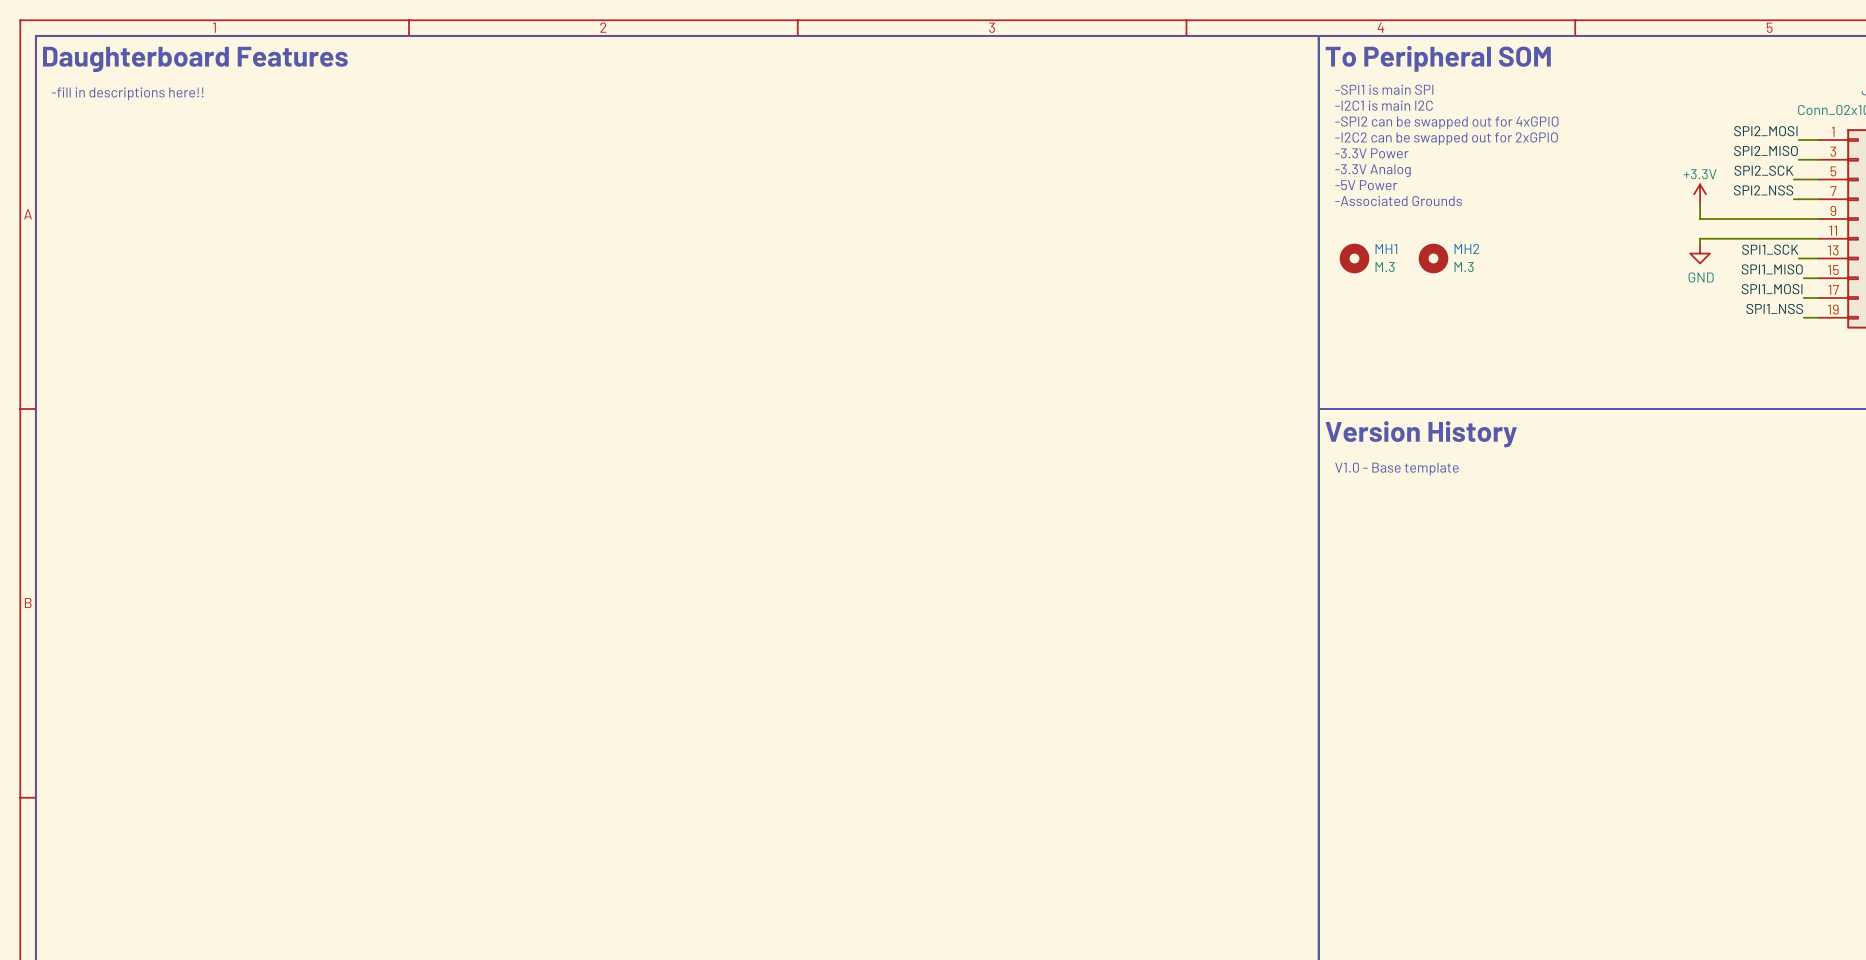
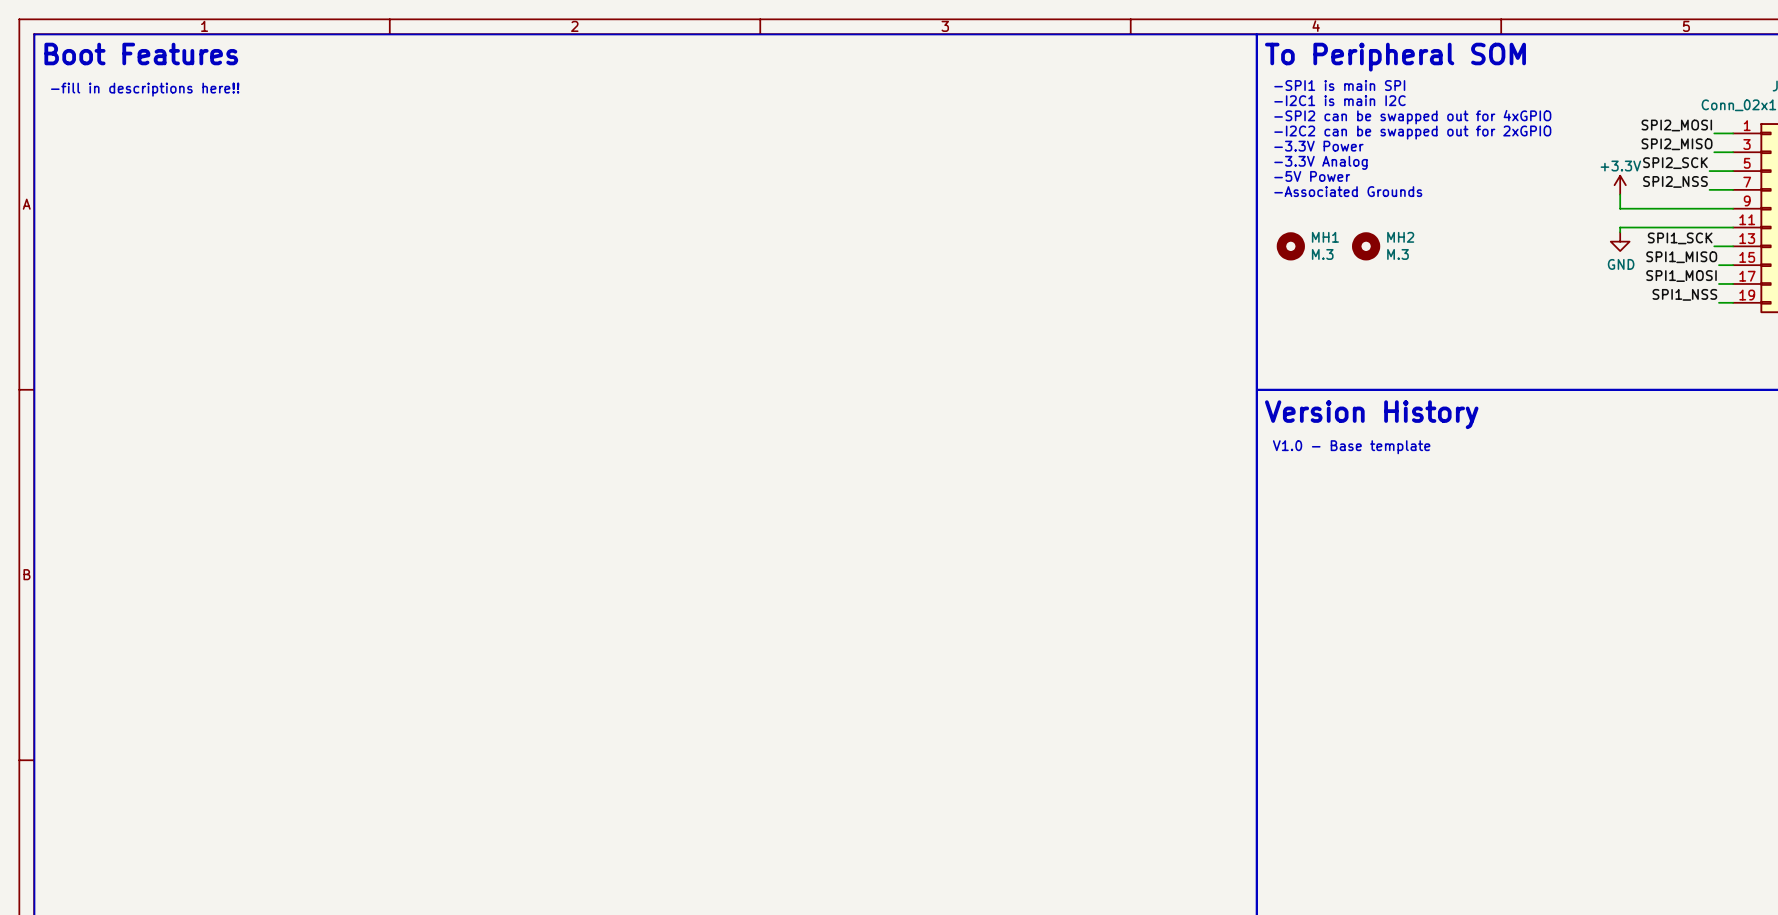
text: Daughterboard Features (195, 59) -> Boot Features (141, 53)

